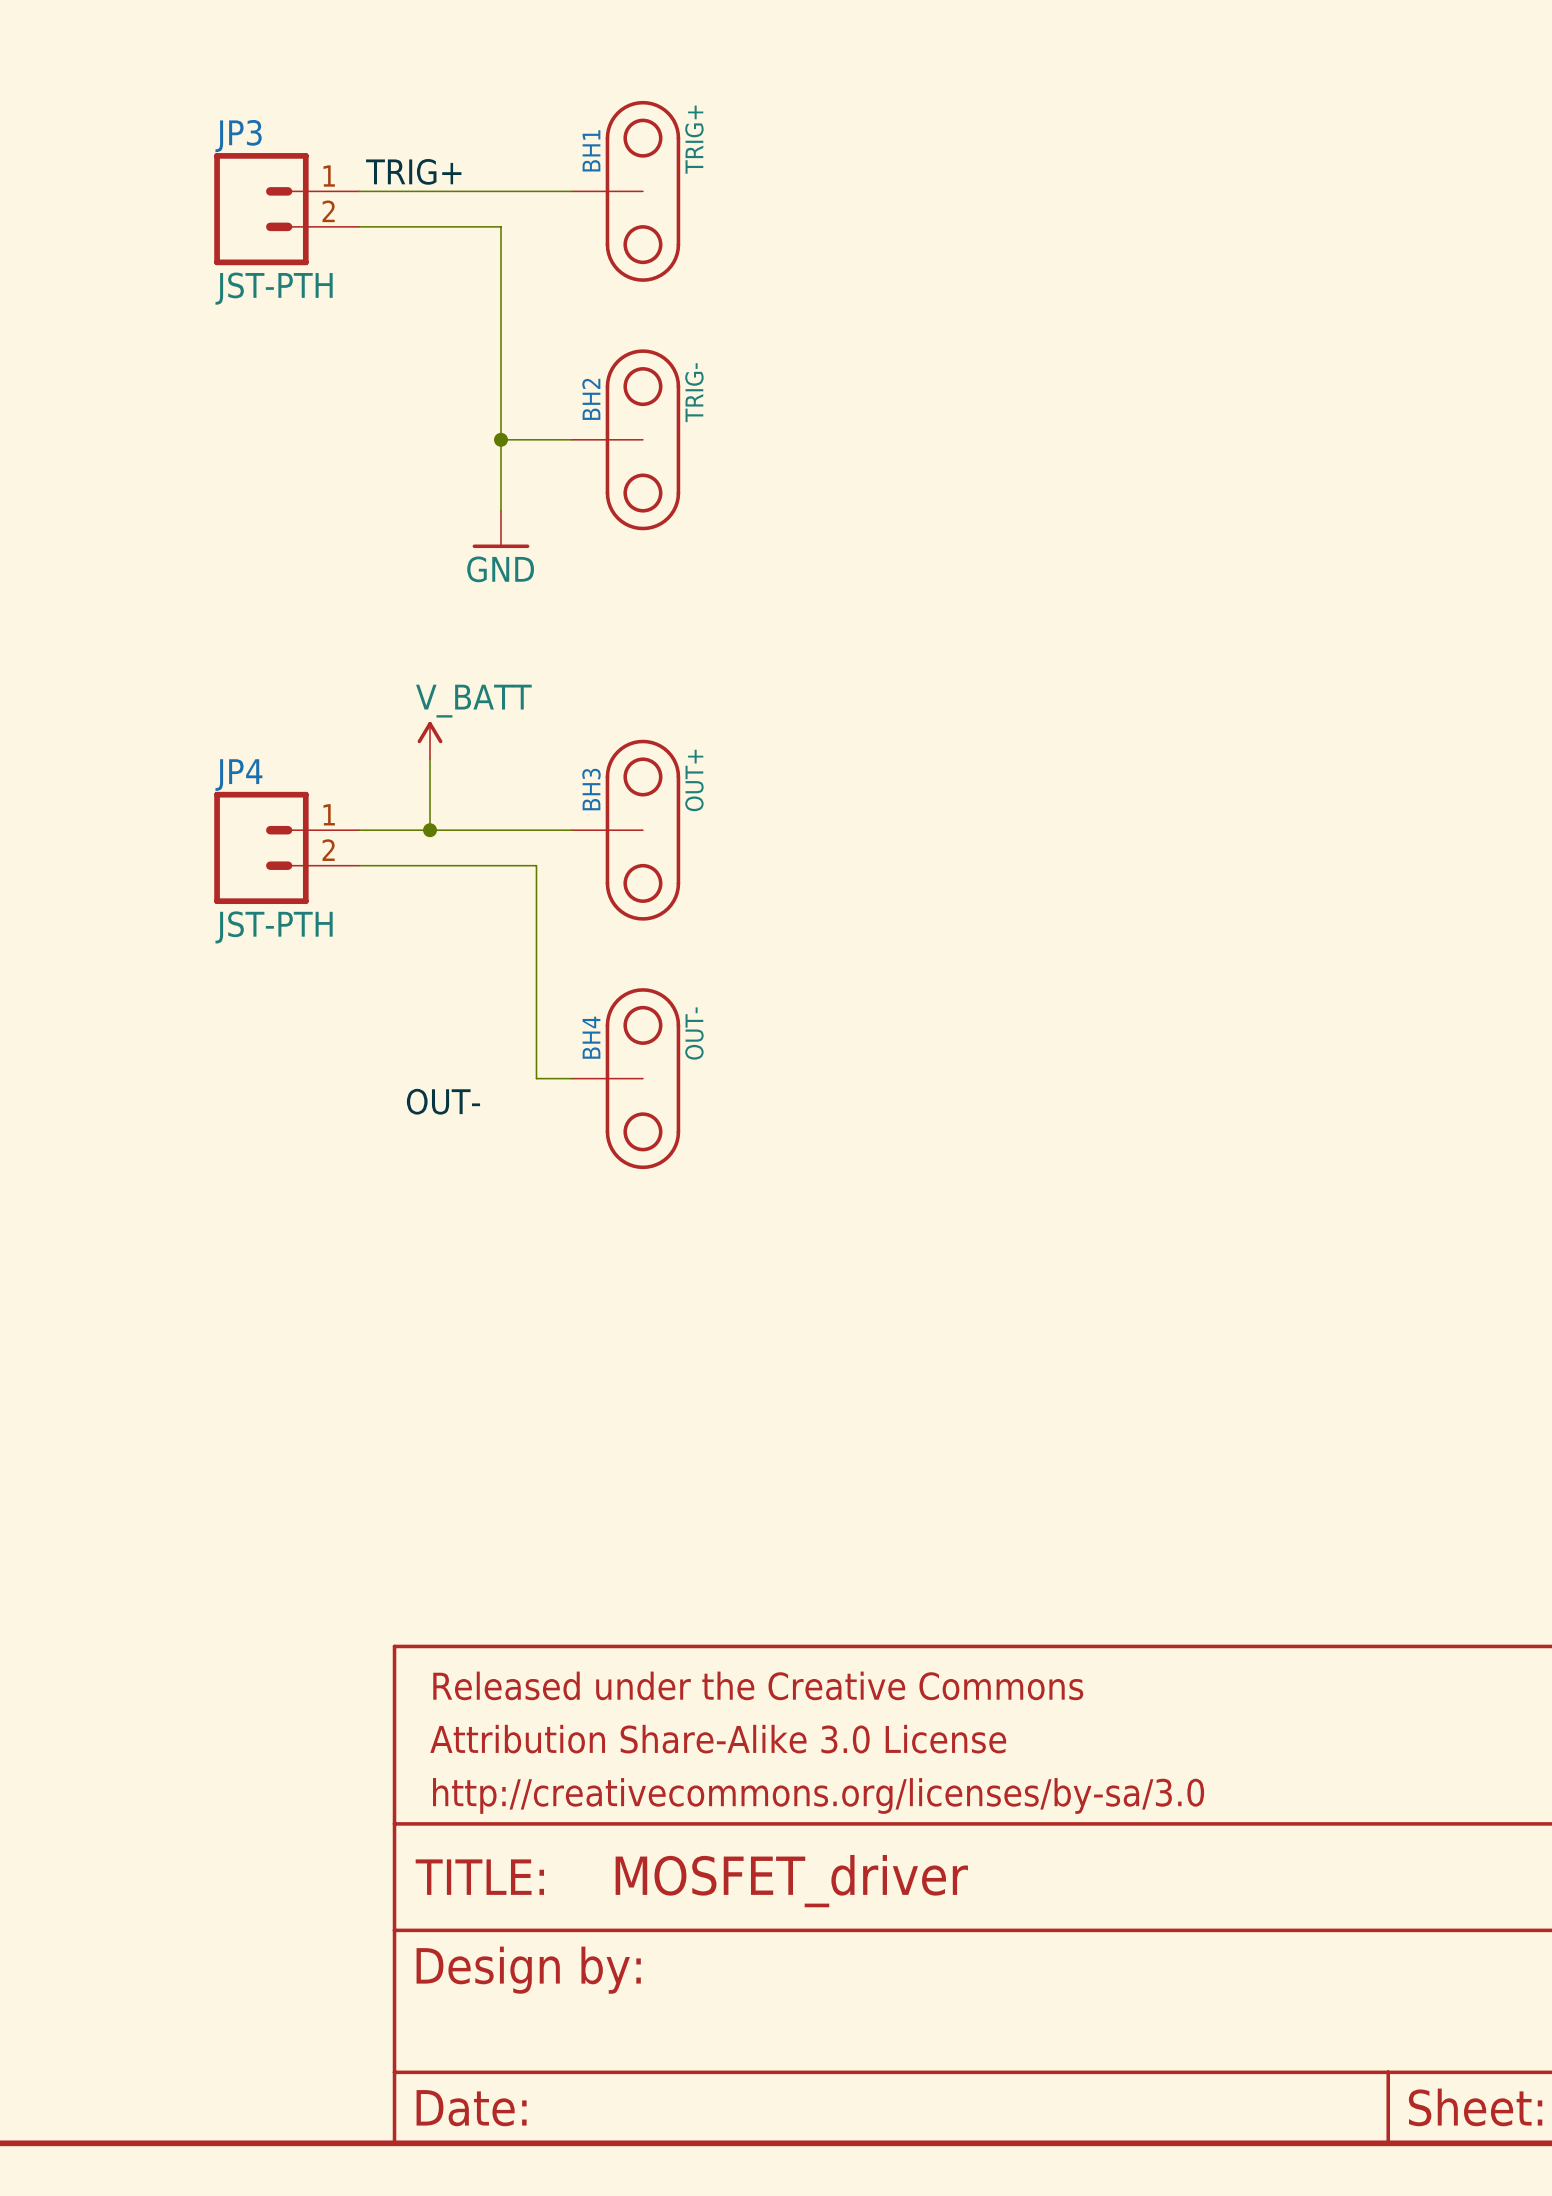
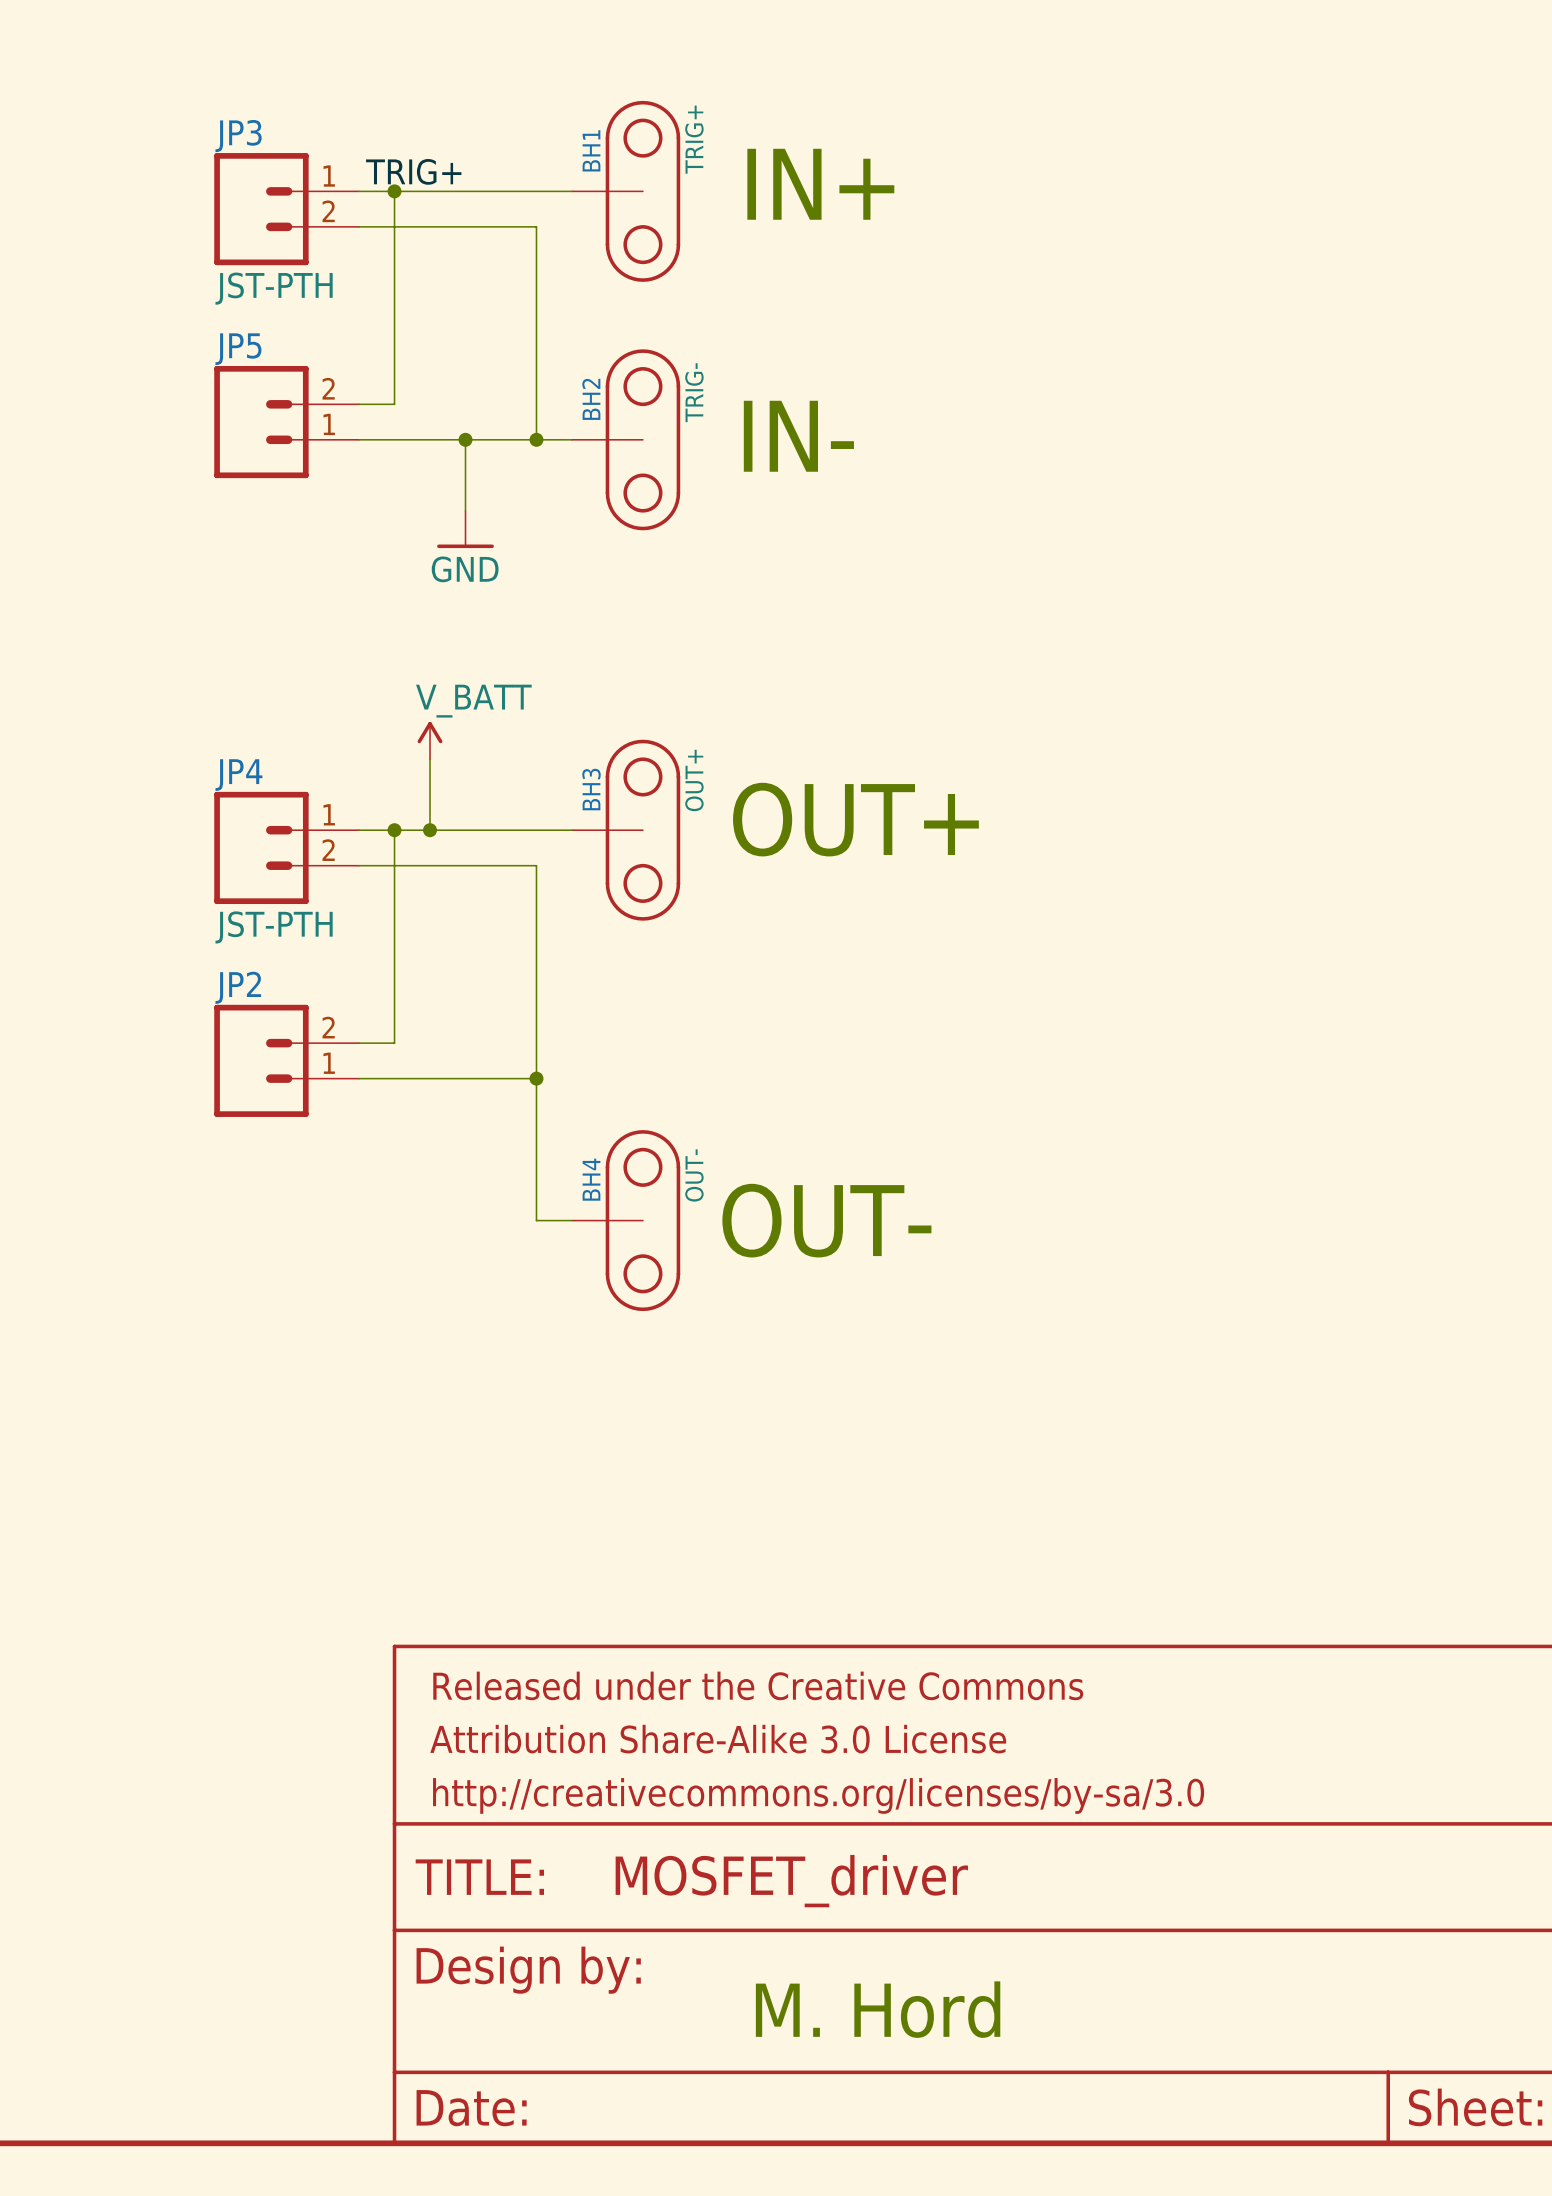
text: none -> IN+ (820, 184)
wire: none -> (394, 191) (394, 404) (359, 404)
junction: none -> (394, 191)
wire: (500, 226) (500, 510) -> (500, 226) (536, 226) (536, 439)
JP5: none -> (286, 422)
text: none -> IN- (798, 436)
wire: none -> (359, 439) (500, 439)
wire: none -> (465, 439) (465, 510)
junction: none -> (465, 439)
junction: (500, 439) -> none
junction: none -> (536, 439)
power symbol position: GND (500, 529) -> GND (465, 529)
text: none -> OUT+ (855, 819)
wire: none -> (394, 830) (394, 1043) (359, 1043)
junction: none -> (394, 830)
JP2: none -> (286, 1060)
wire: none -> (359, 1078) (536, 1078) (536, 1220) (571, 1220)
wire: (536, 1078) (571, 1078) -> none
junction: none -> (536, 1078)
BH4 position: (626, 1078) -> (626, 1220)
label: OUT- (443, 1101) -> none
text: none -> OUT- (826, 1220)
text: none -> M. Hord (878, 2009)

